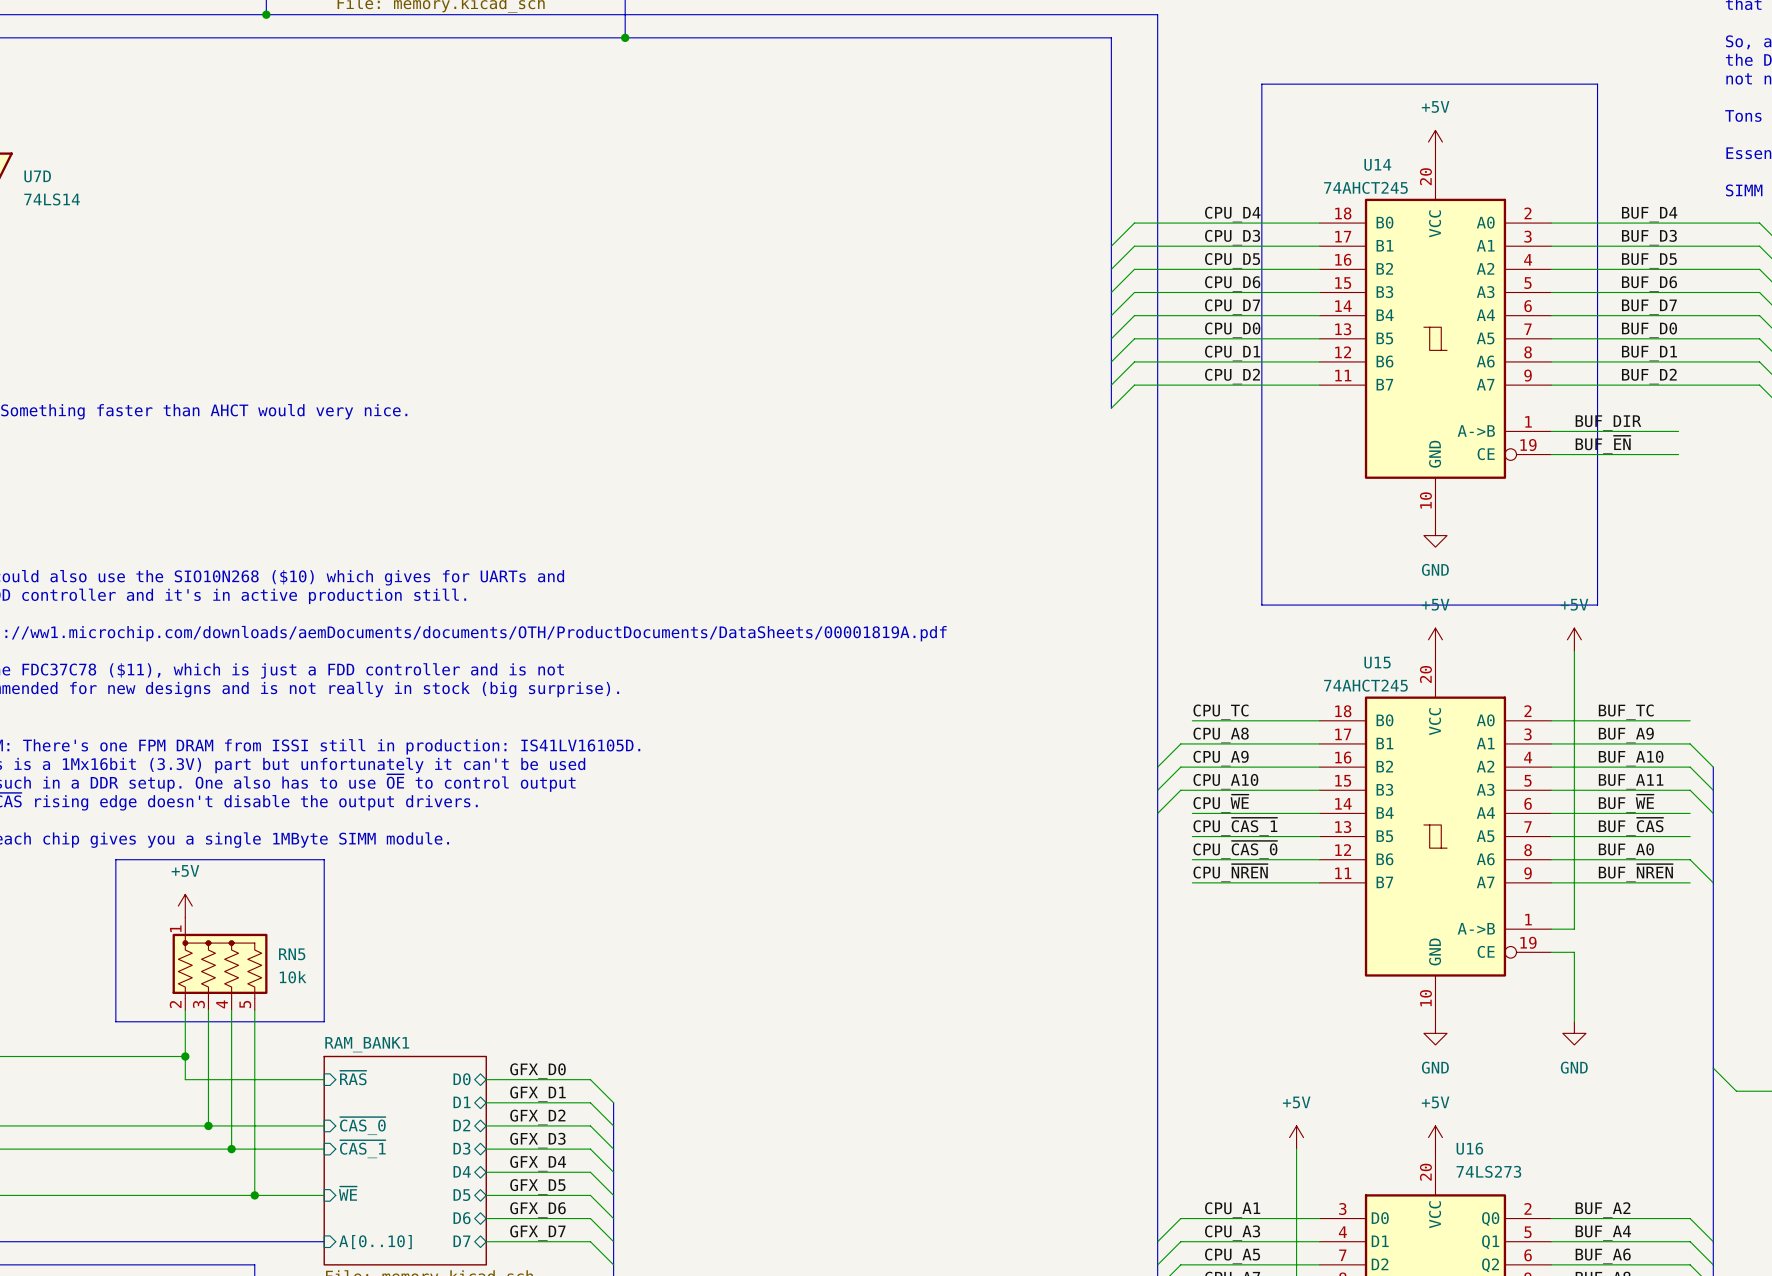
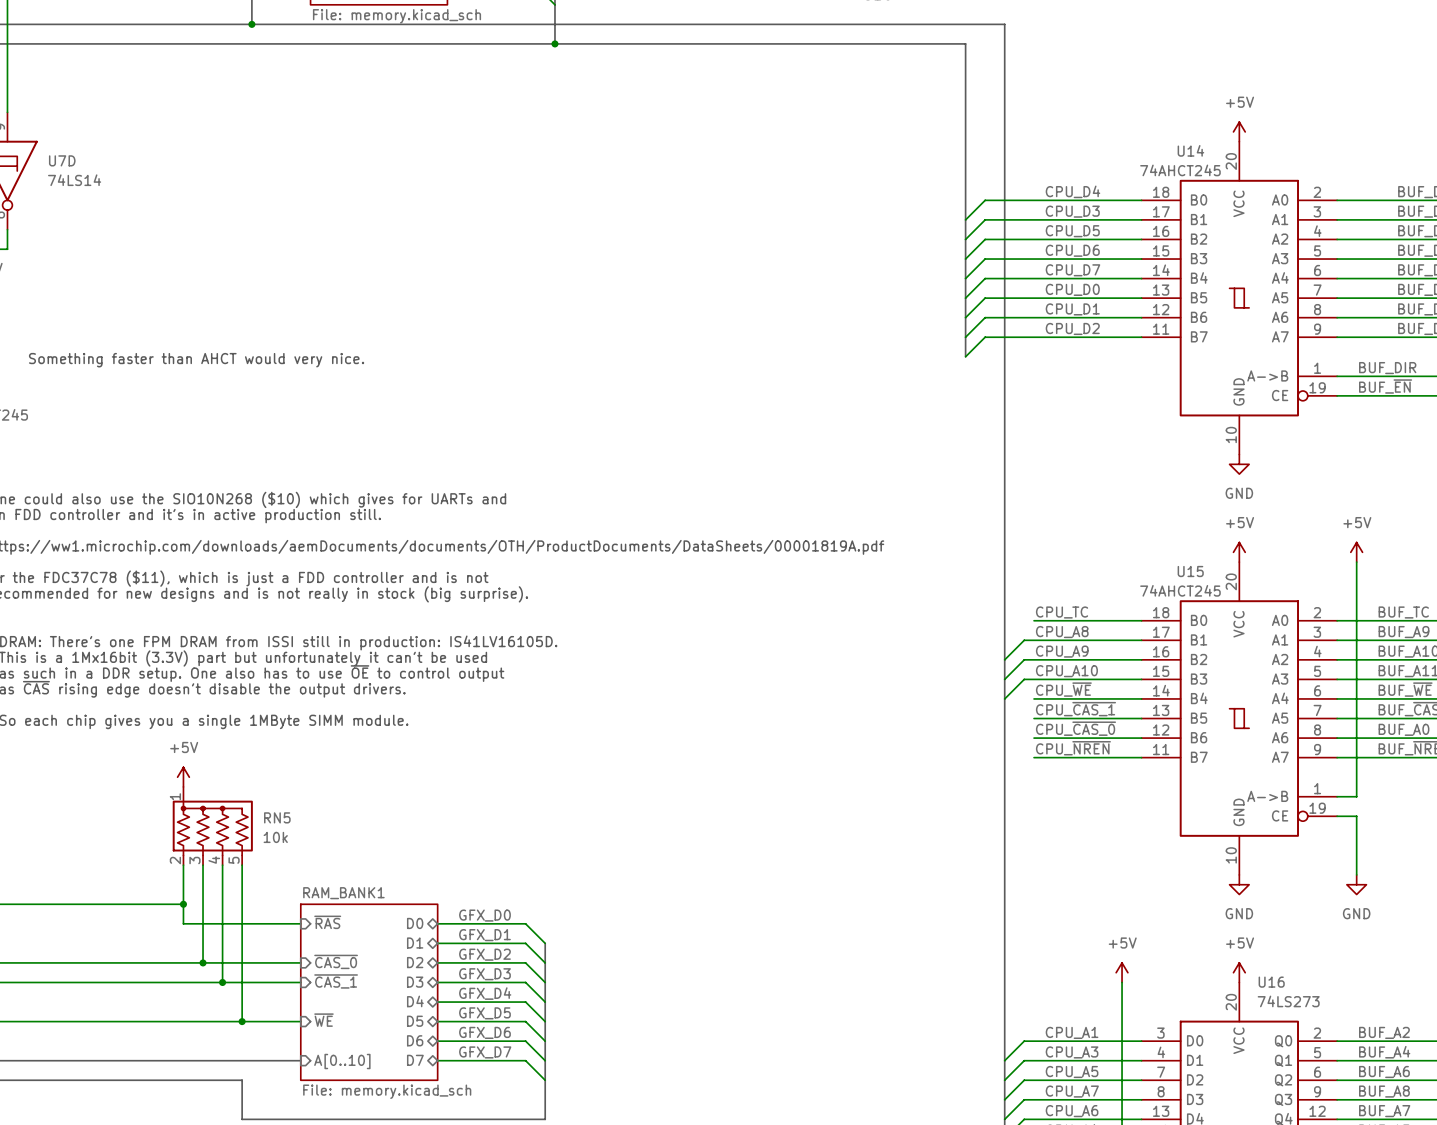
line: (1261, 84) (1597, 84) (1597, 605) (1261, 605) (1261, 84) -> none
line: (115, 859) (324, 859) (324, 1021) (115, 1021) (115, 859) -> none

